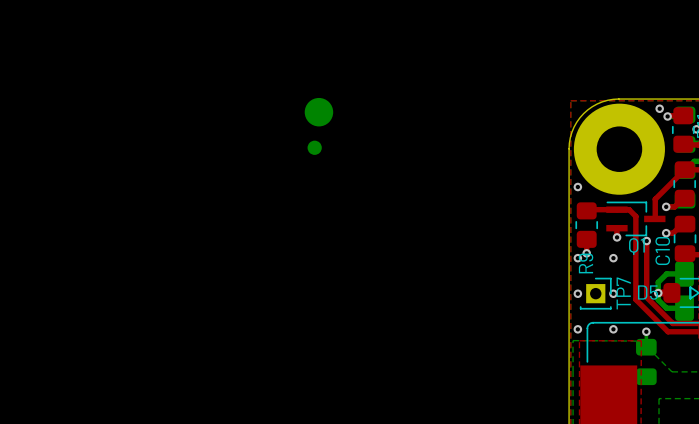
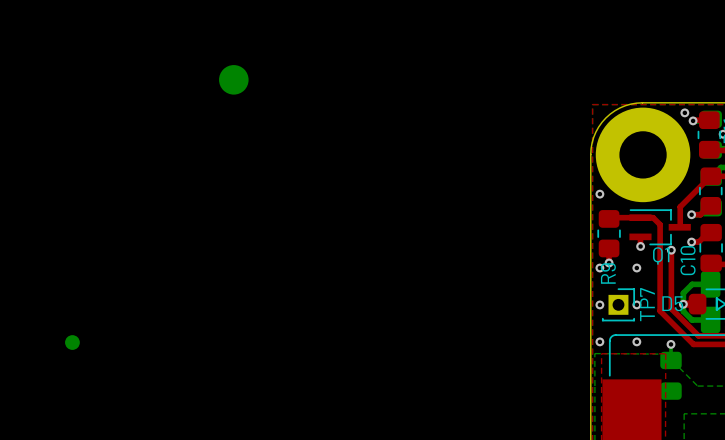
part position: (318, 112) -> (233, 79)
part position: (314, 147) -> (72, 342)

